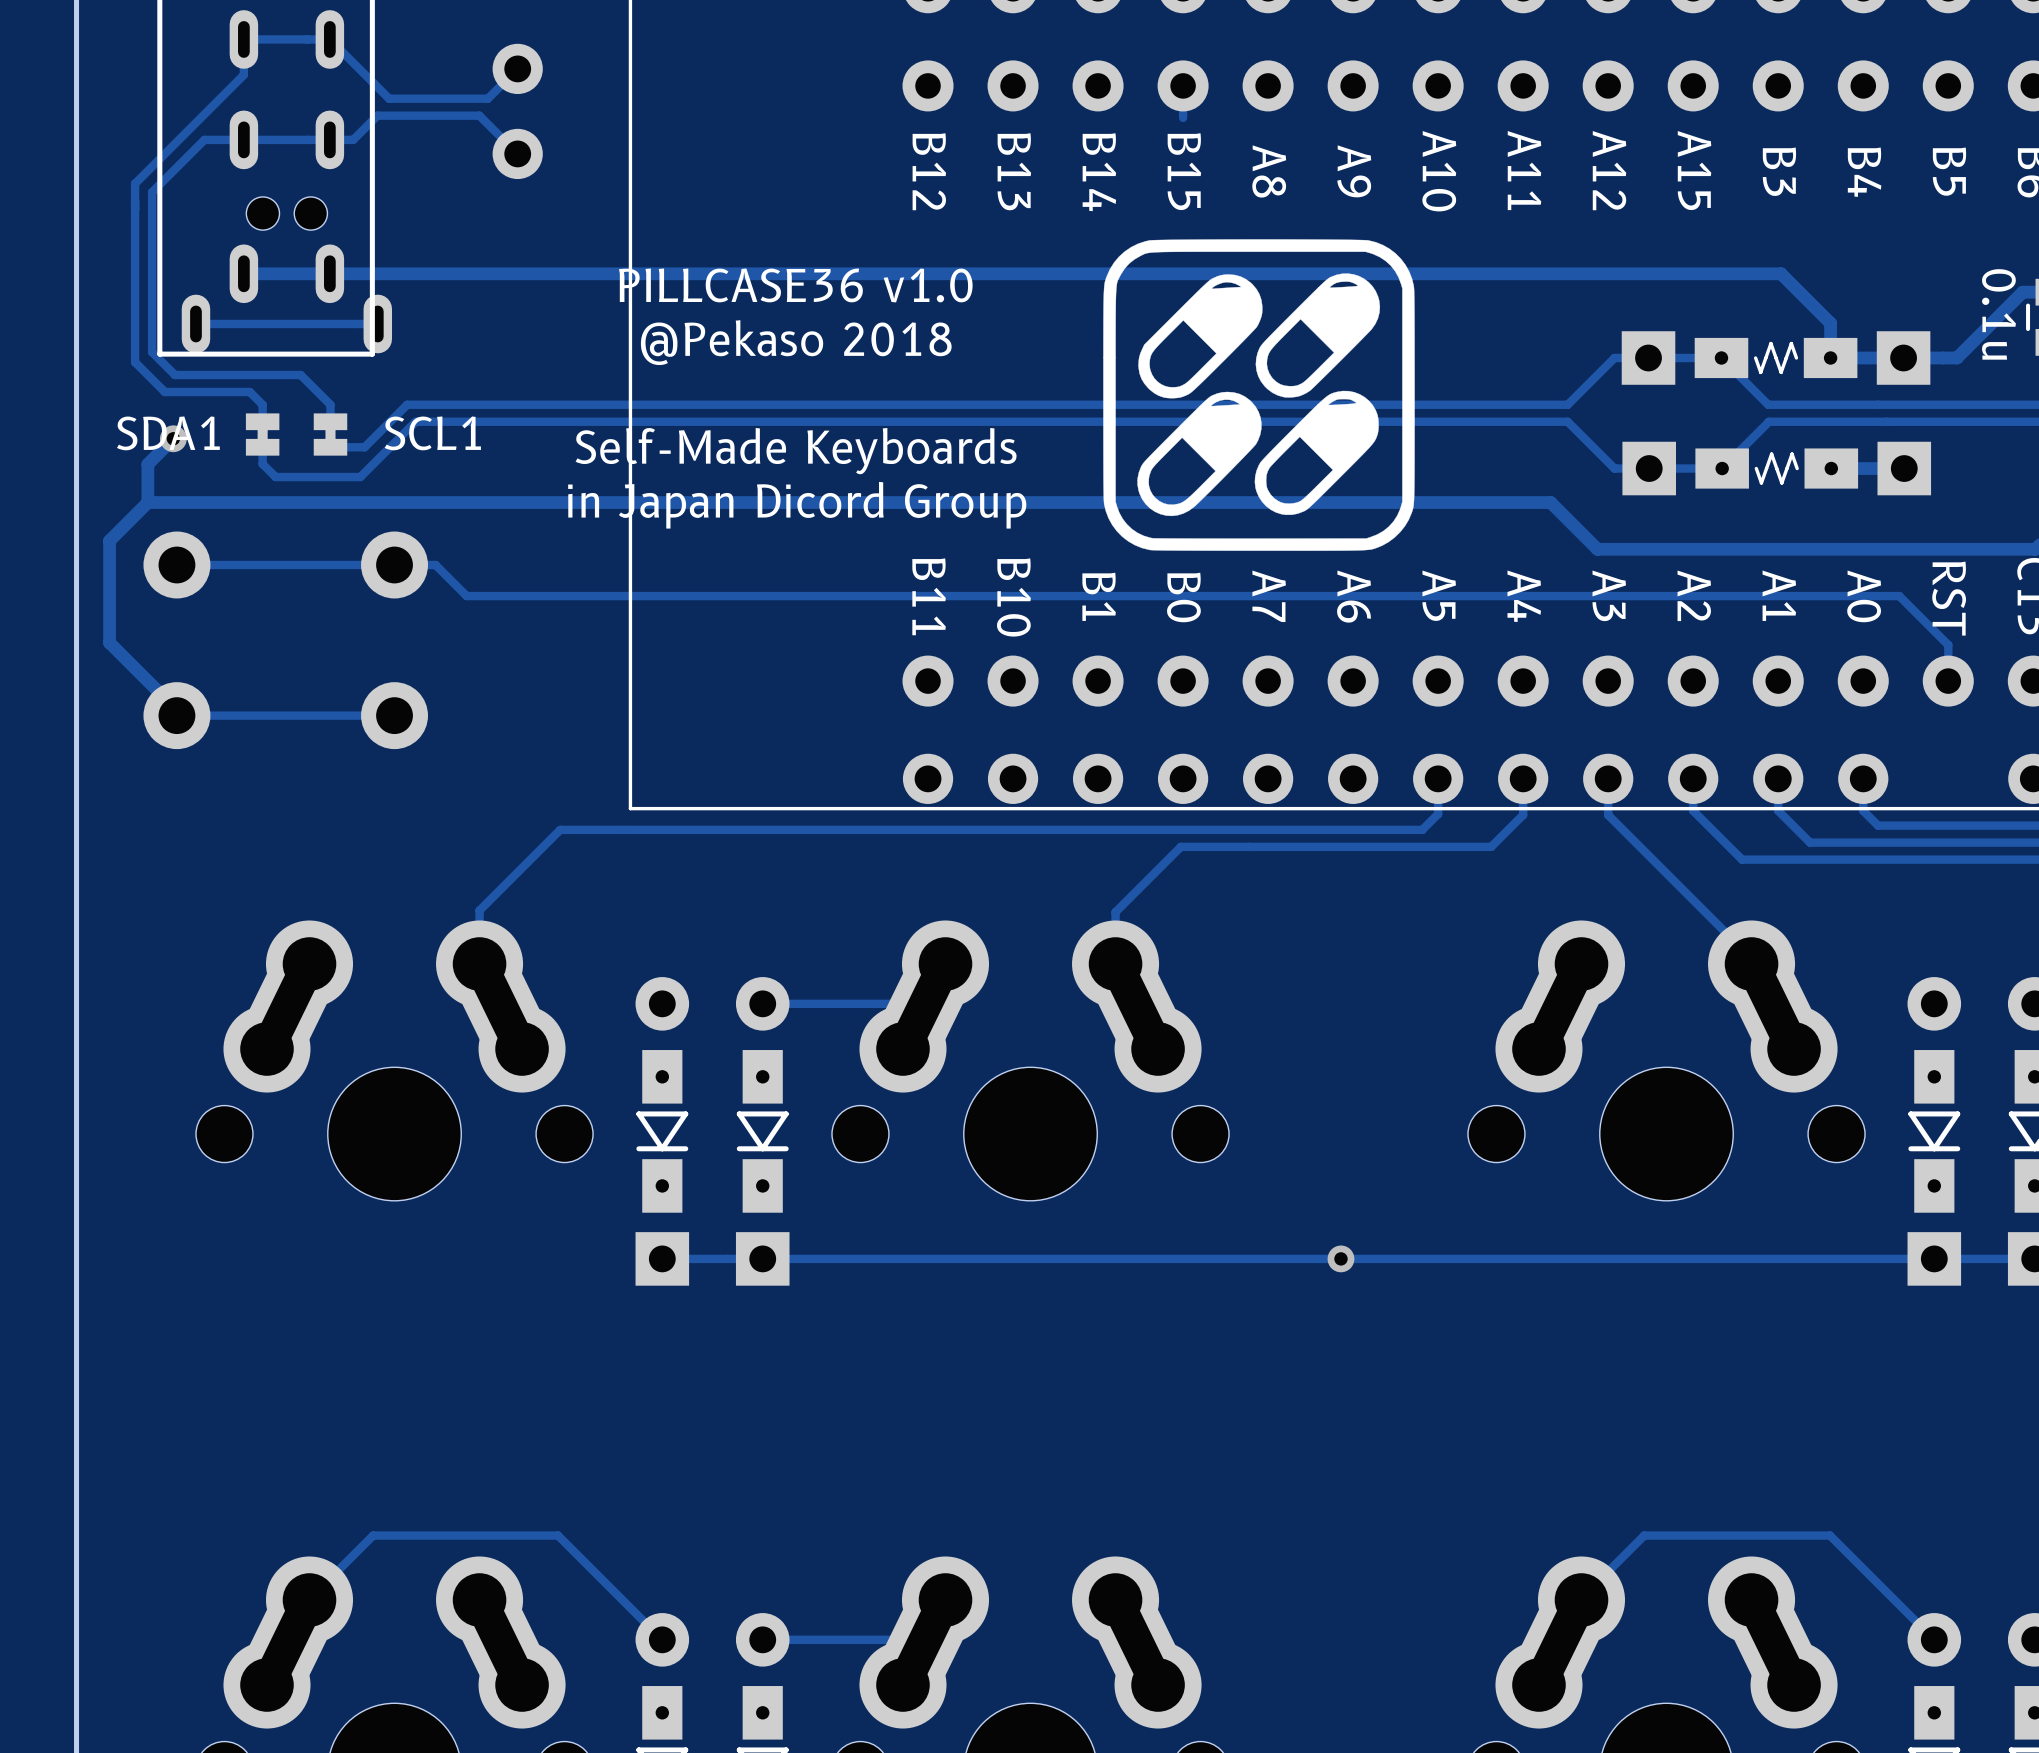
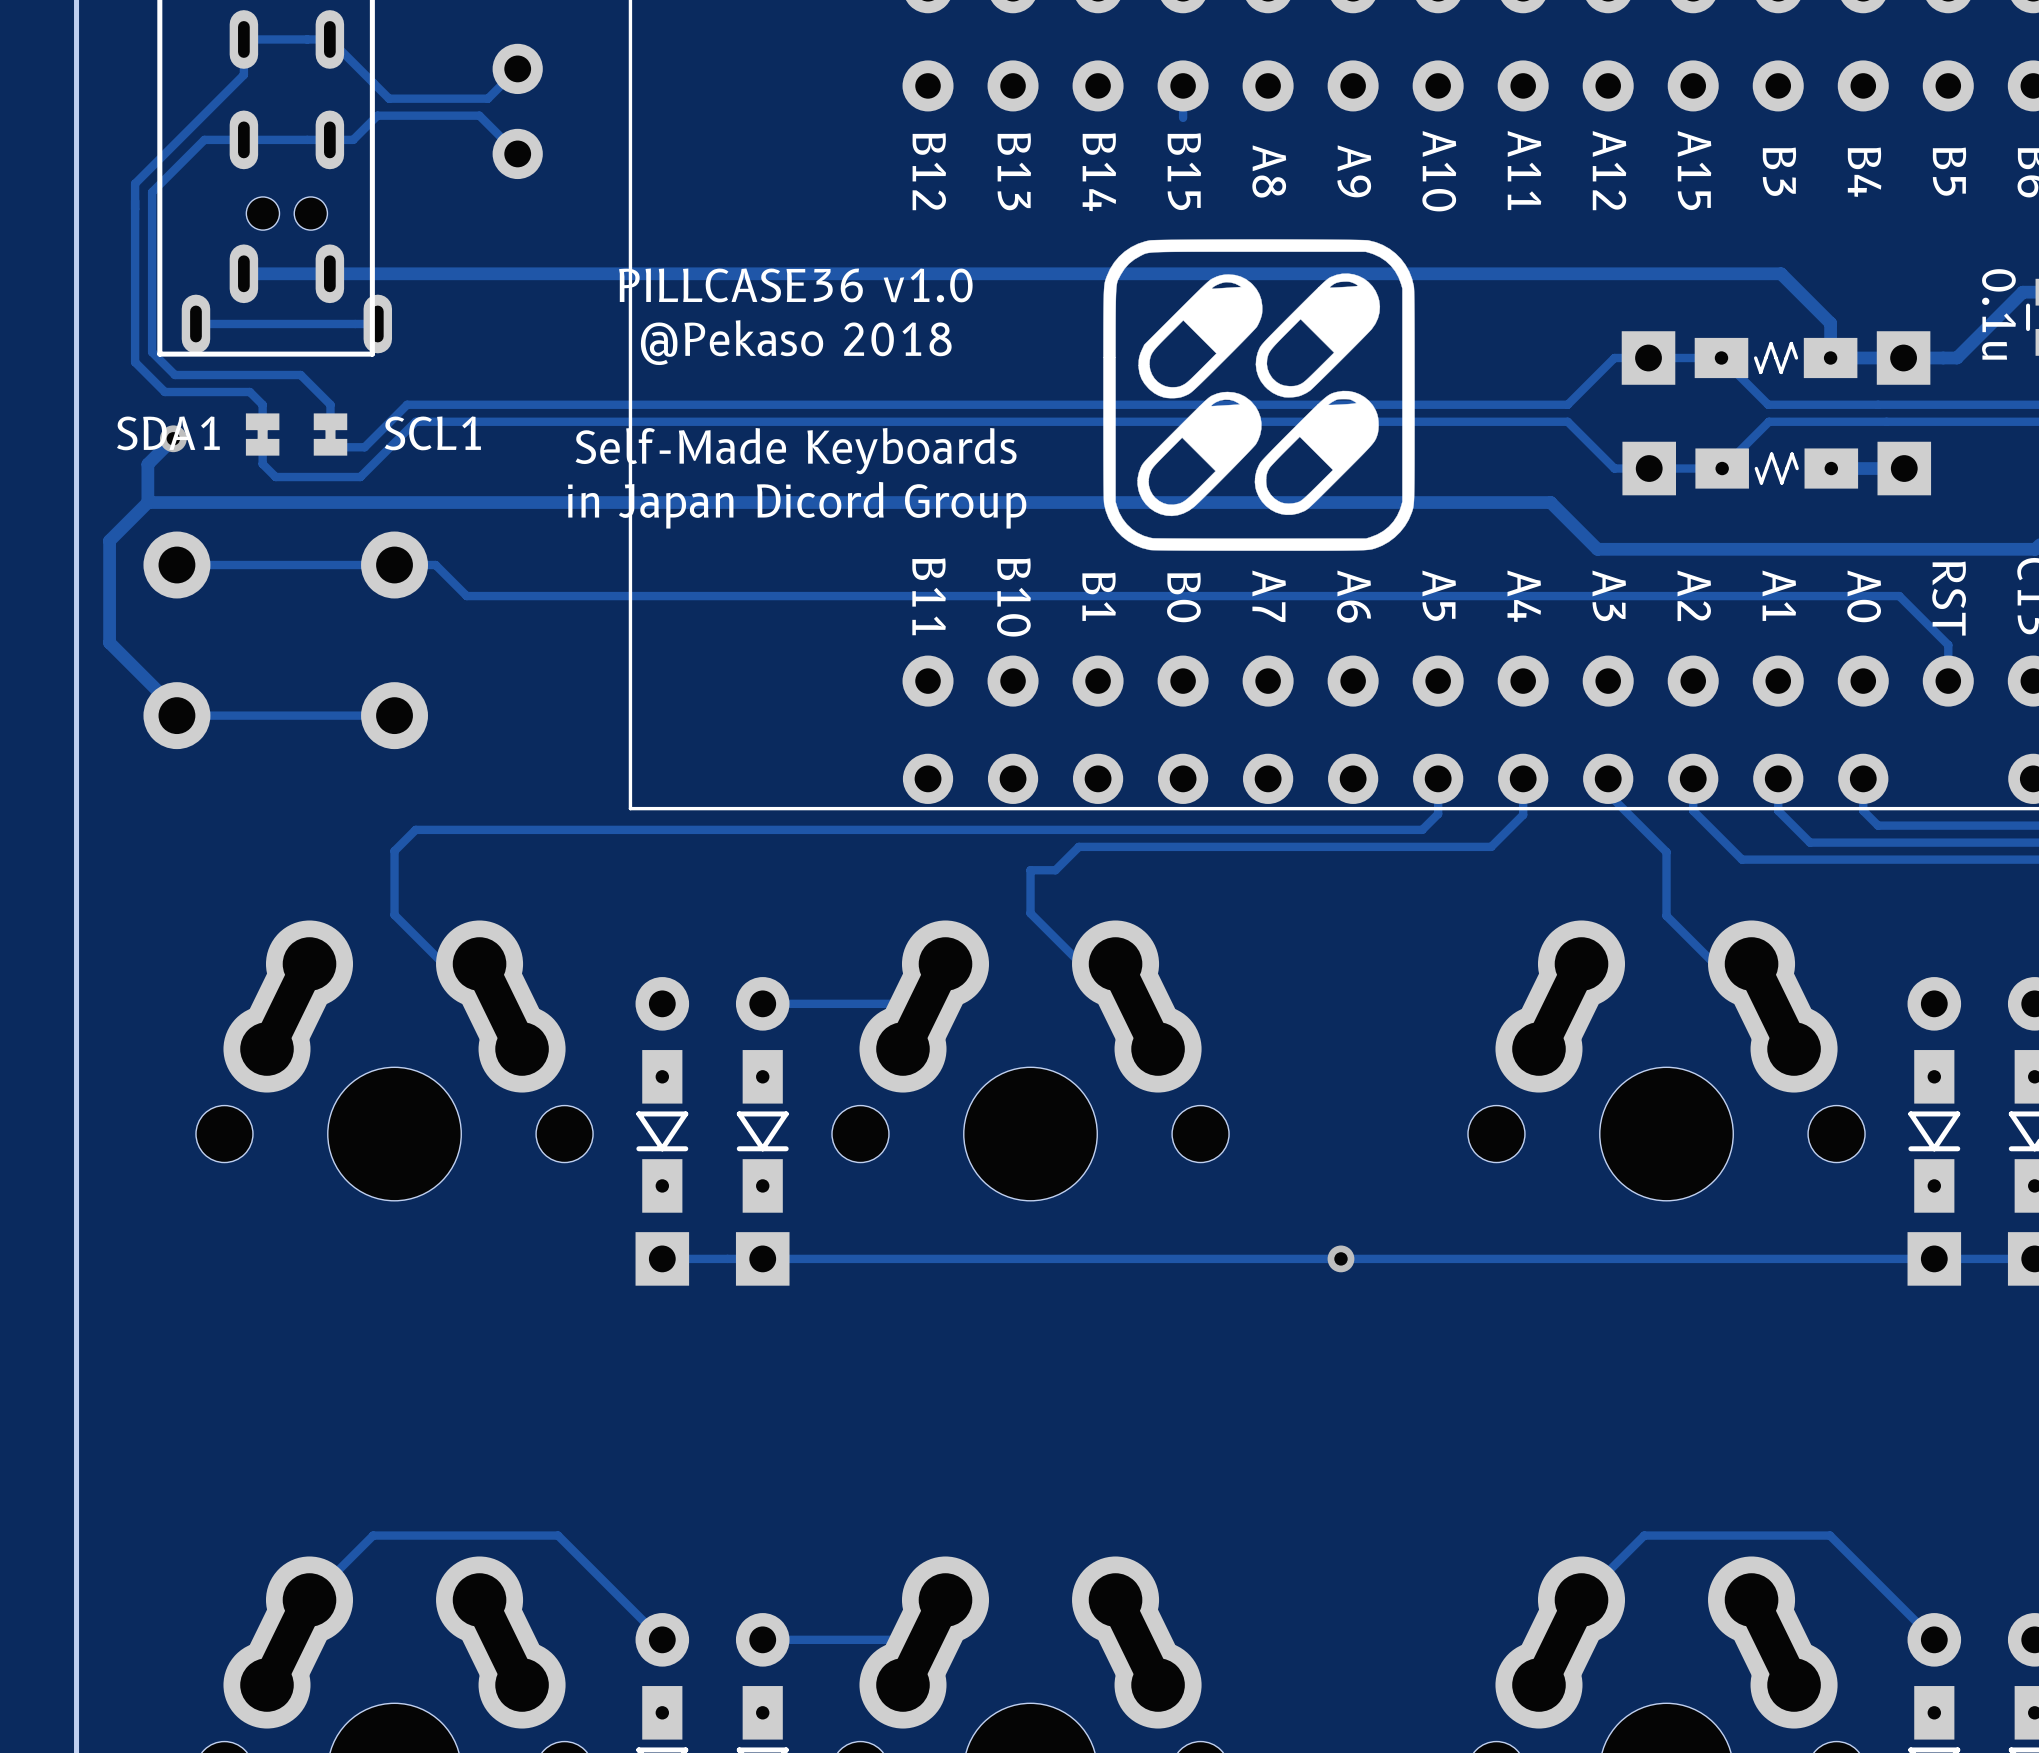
track: (1608, 793) (1608, 815) (1751, 958) (1751, 964) -> (1608, 793) (1666, 852) (1666, 915) (1714, 964) (1751, 964)
track: (560, 829) (479, 910) (479, 964) -> (560, 829) (415, 829) (394, 851) (394, 915) (486, 1006)
track: (1180, 846) (1115, 912) (1115, 964) -> (1180, 846) (1078, 846) (1055, 870) (1030, 870) (1030, 913) (1123, 1006)

